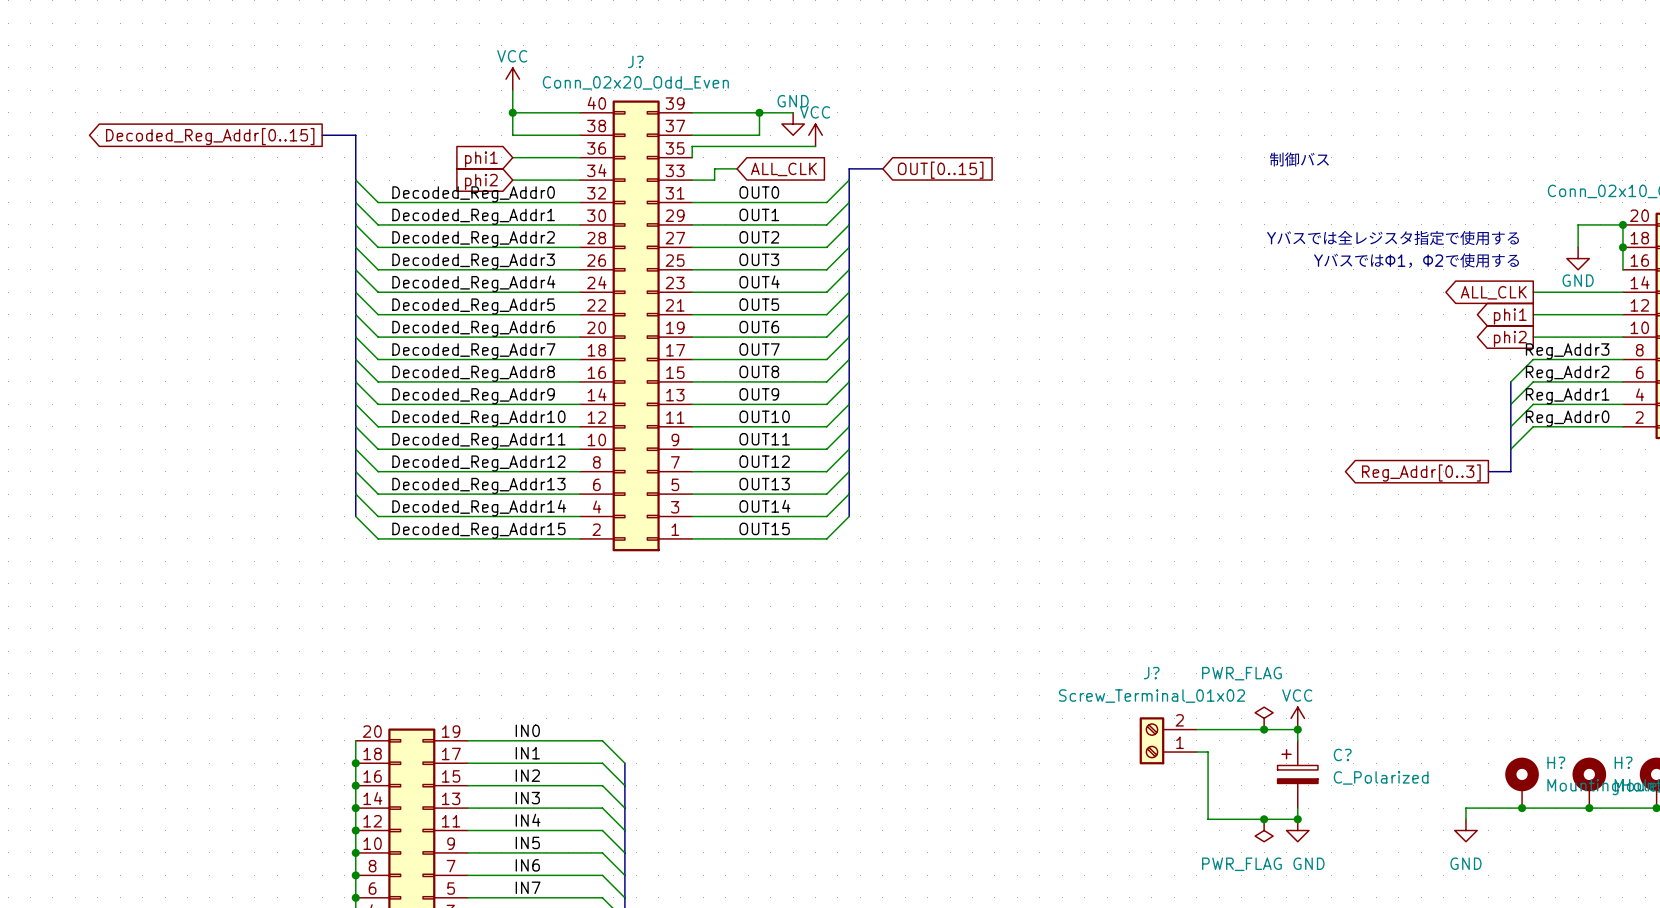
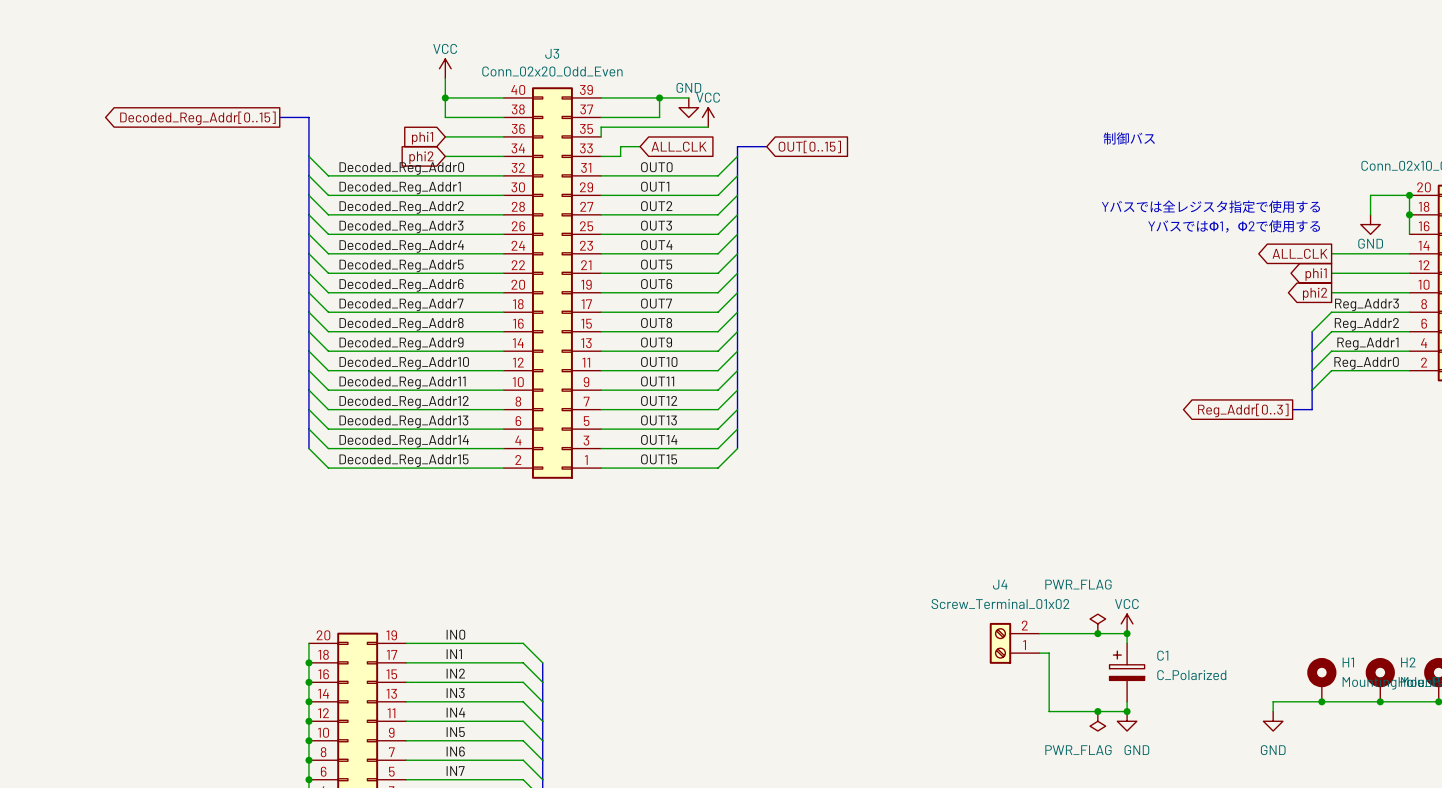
J? name: J? (635, 61) -> J3 (552, 53)
J? name: J? (1151, 673) -> J4 (1000, 584)
C? name: C? (1342, 754) -> C1 (1162, 655)
H? name: H? (1556, 762) -> H1 (1348, 662)
H? name: H? (1623, 762) -> H2 (1408, 662)

